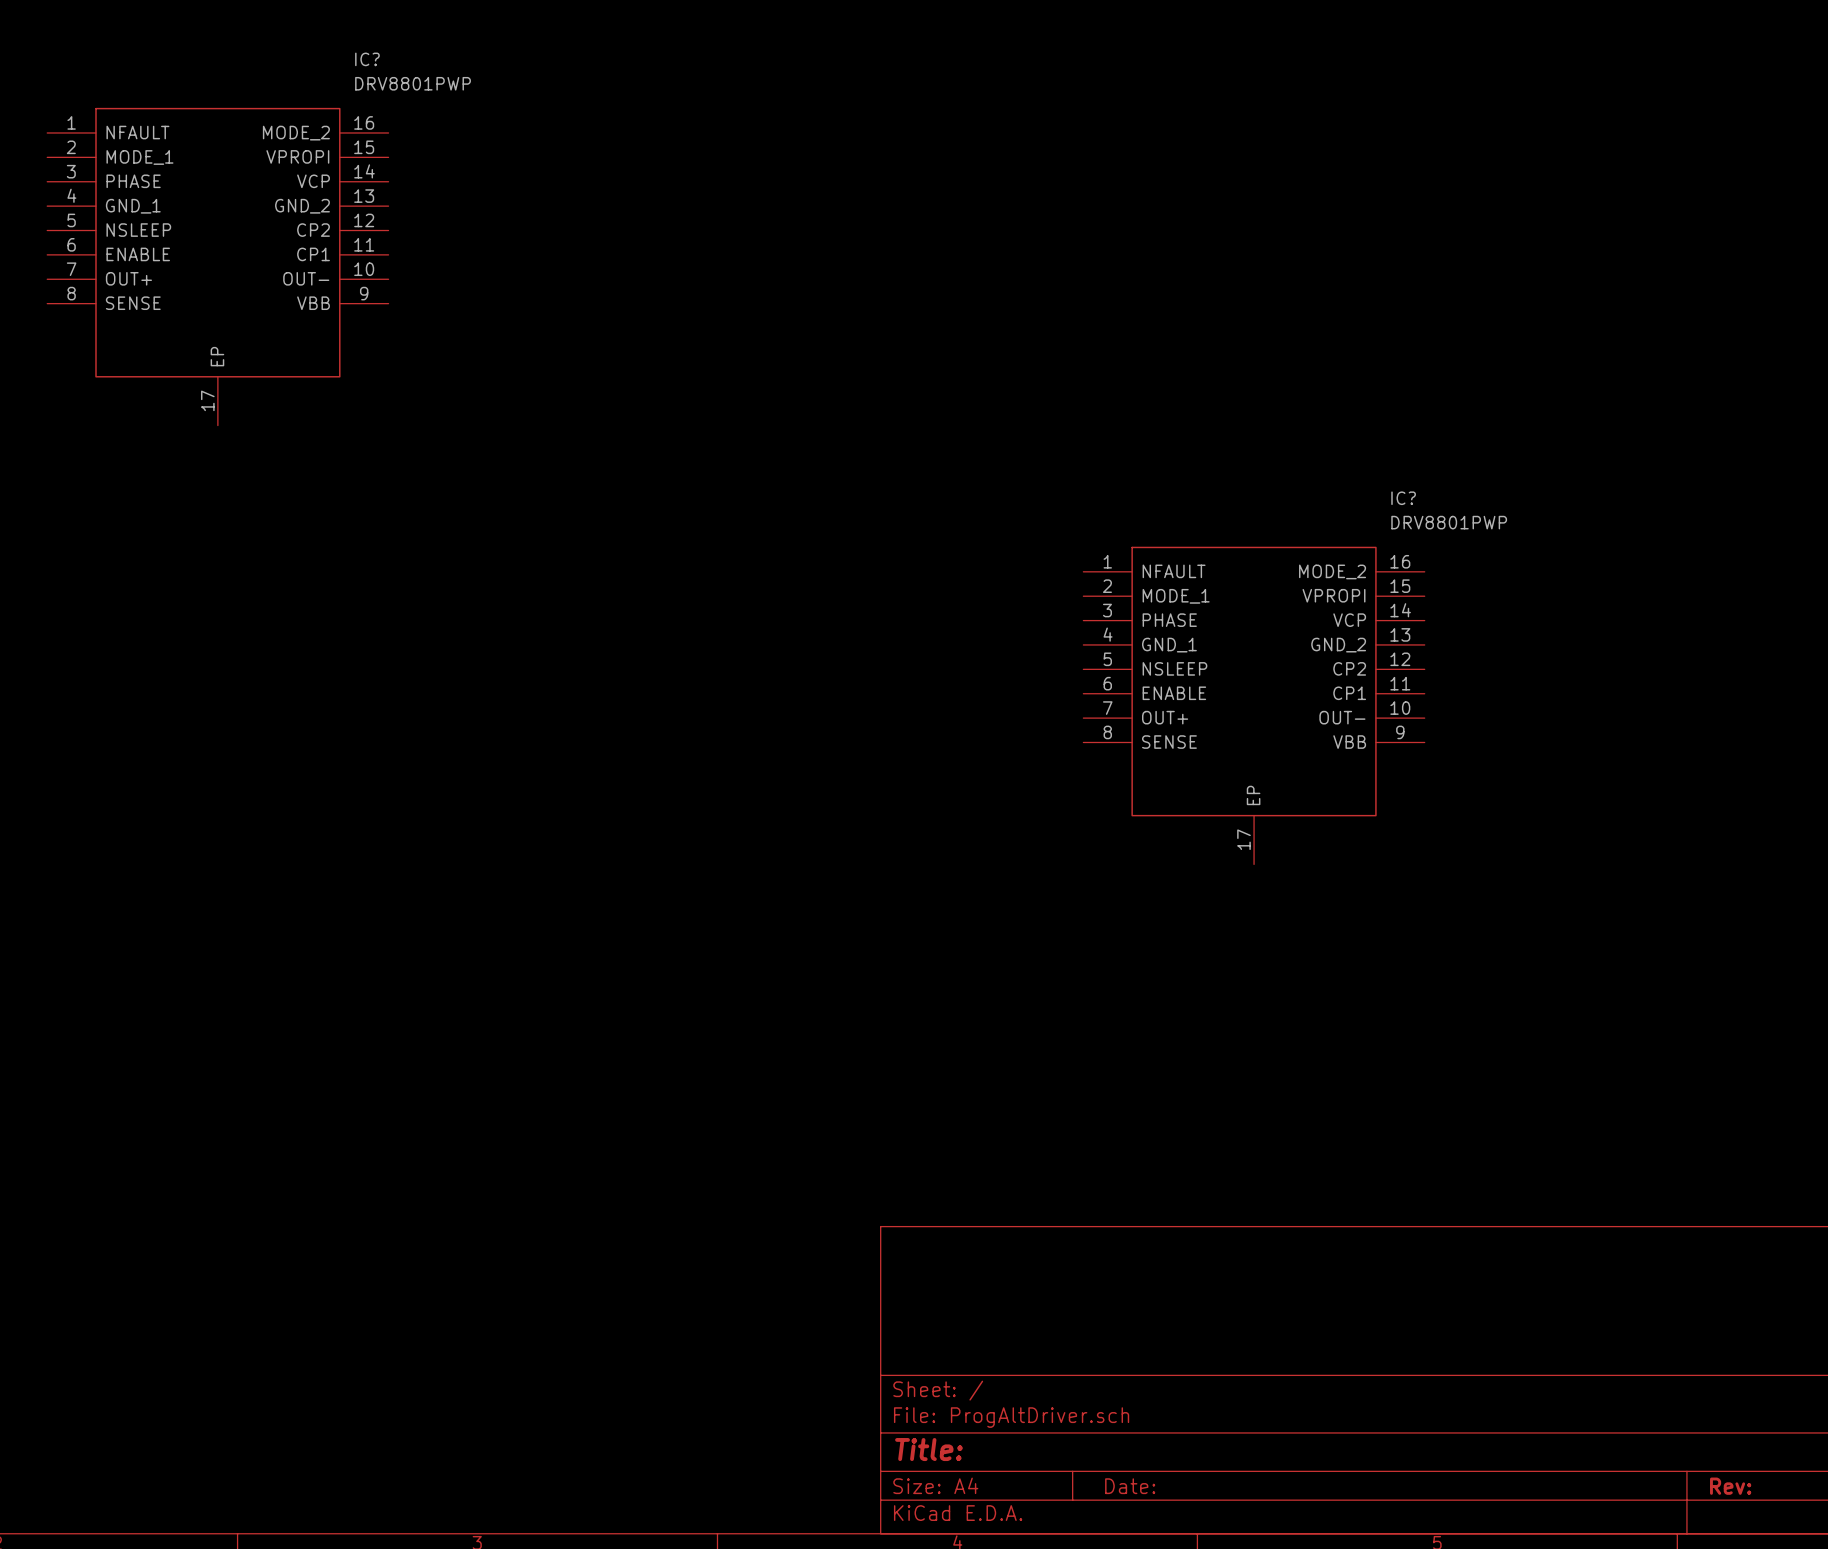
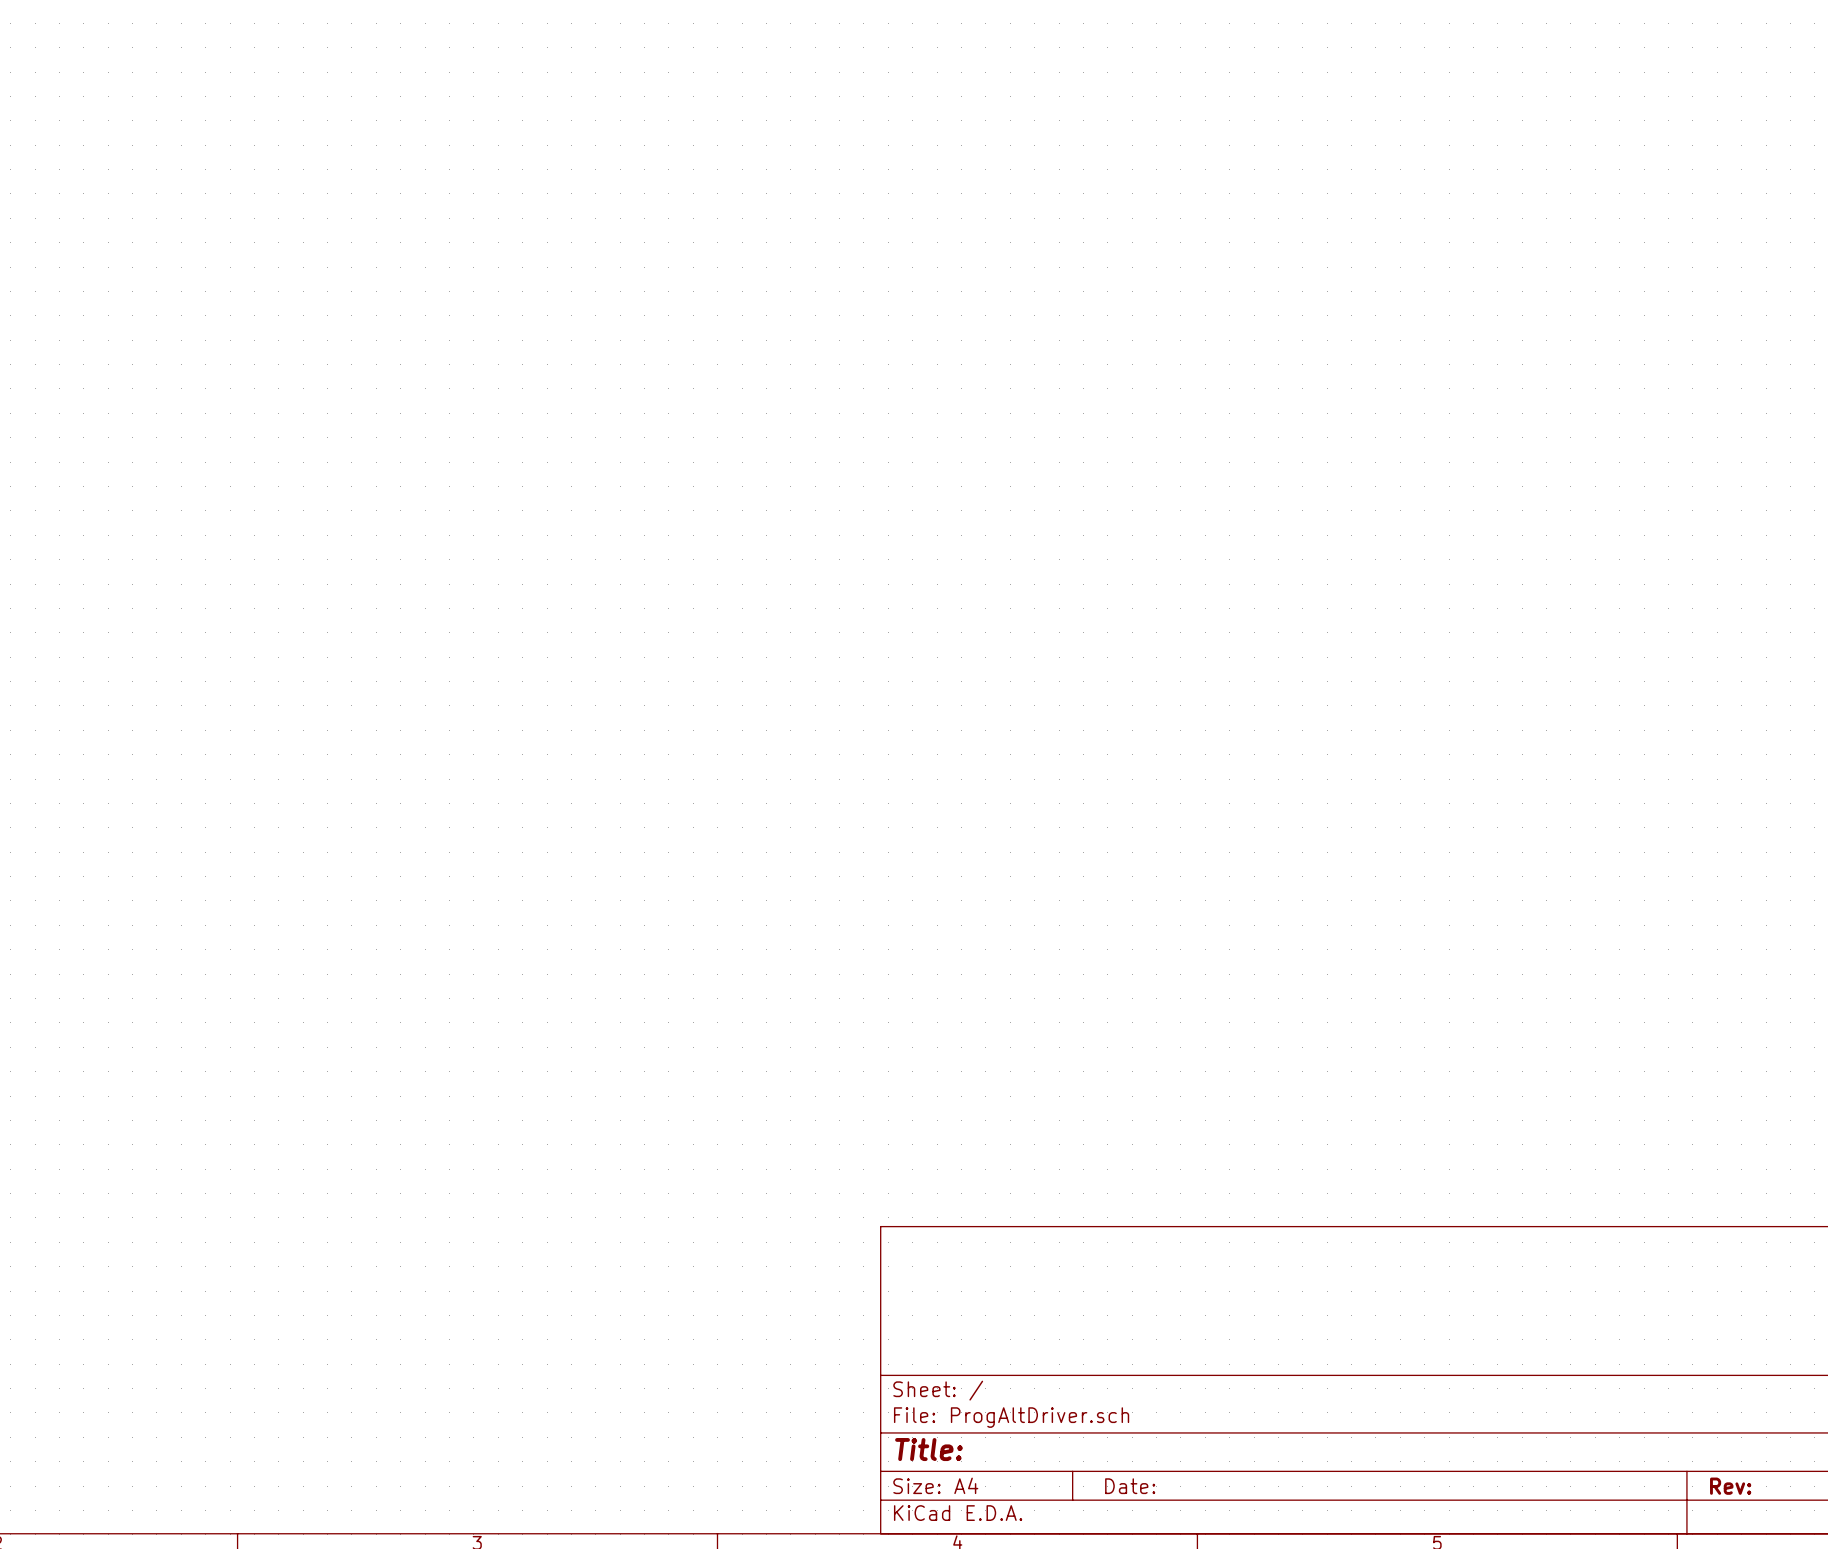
IC?: DRV8801PWP (217, 266) -> none
IC?: DRV8801PWP (1254, 705) -> none

